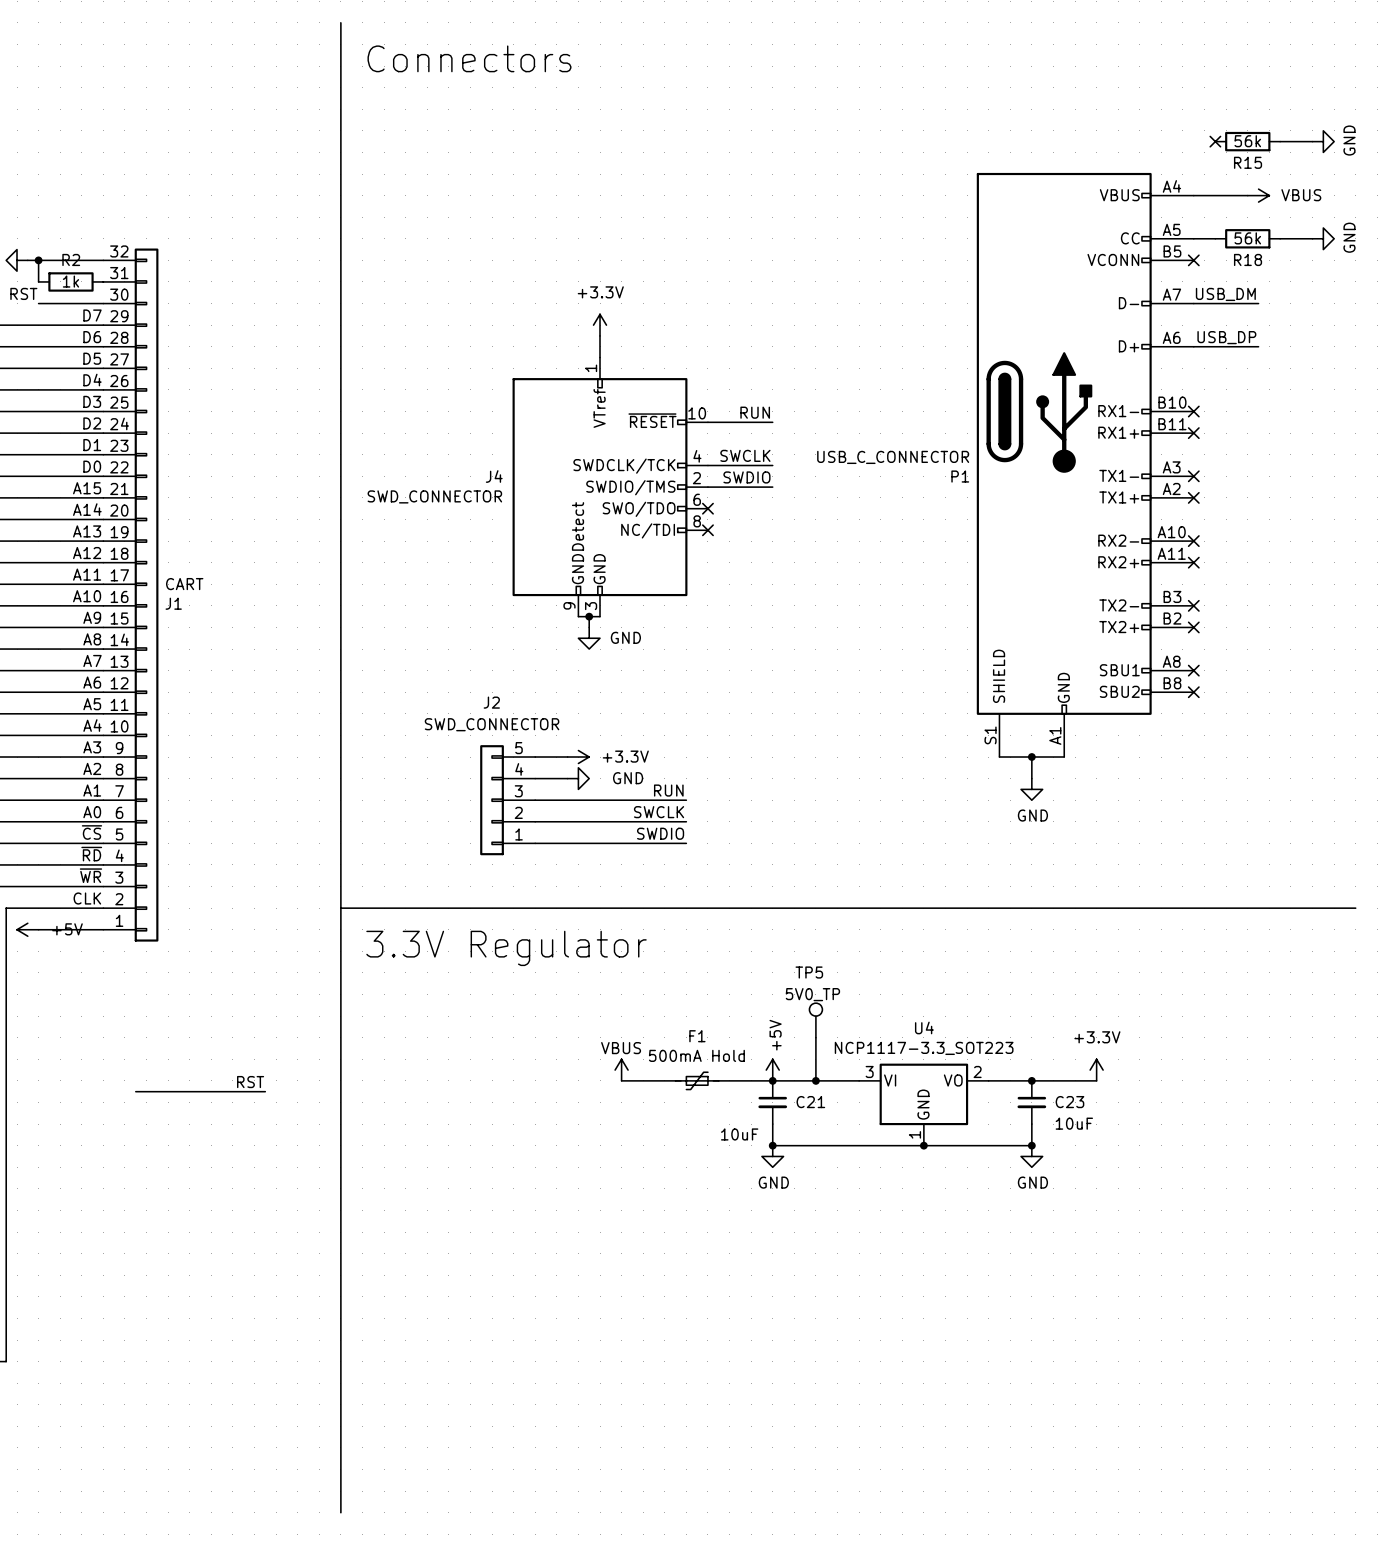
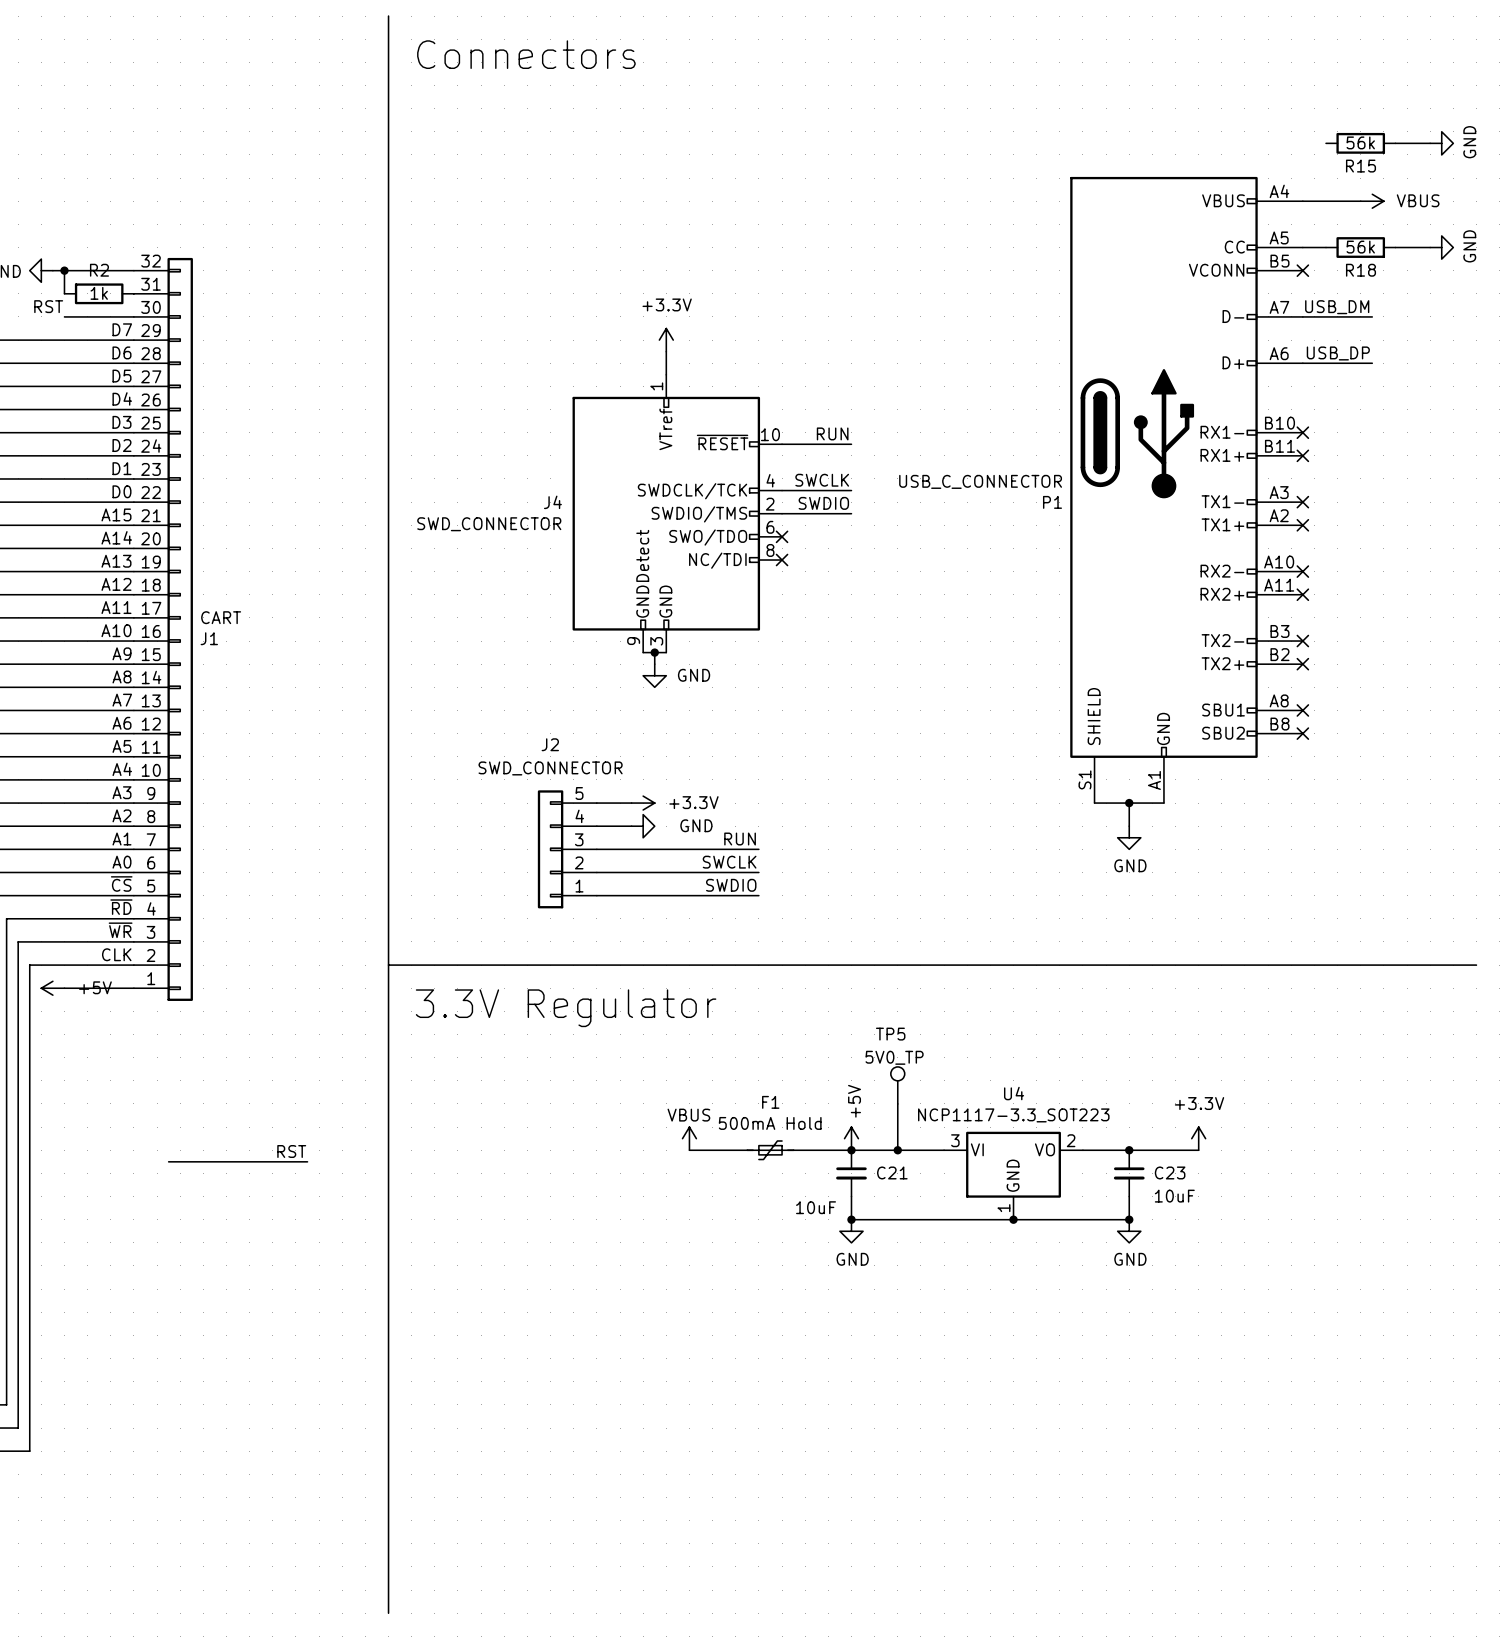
no-connect mark: (1215, 141) -> none

